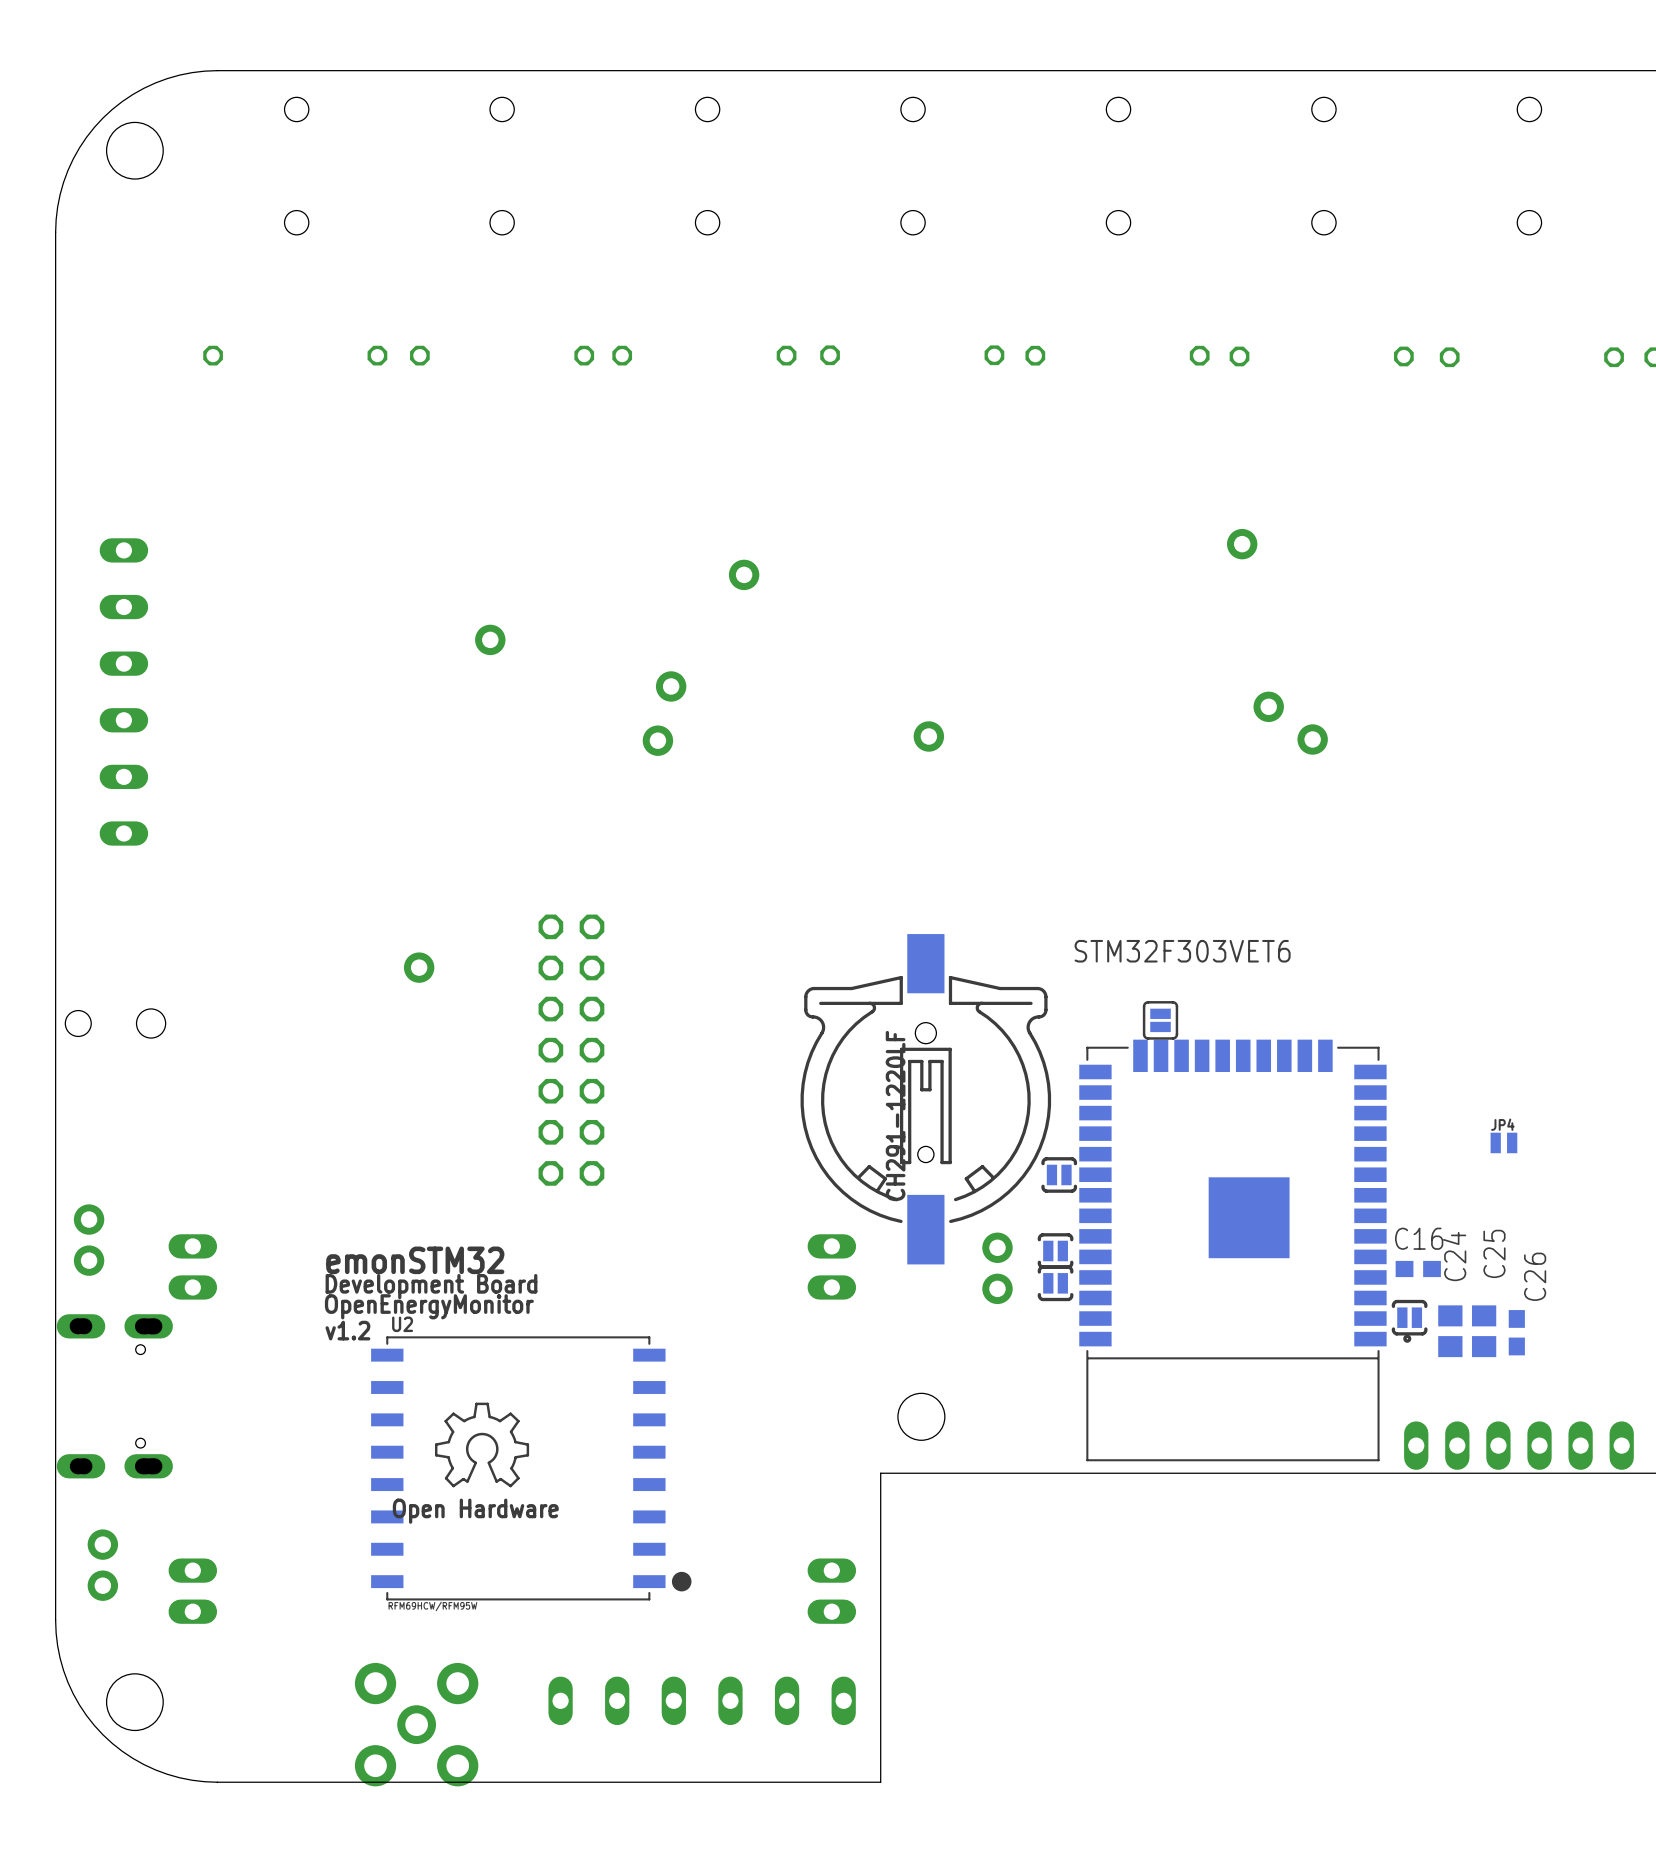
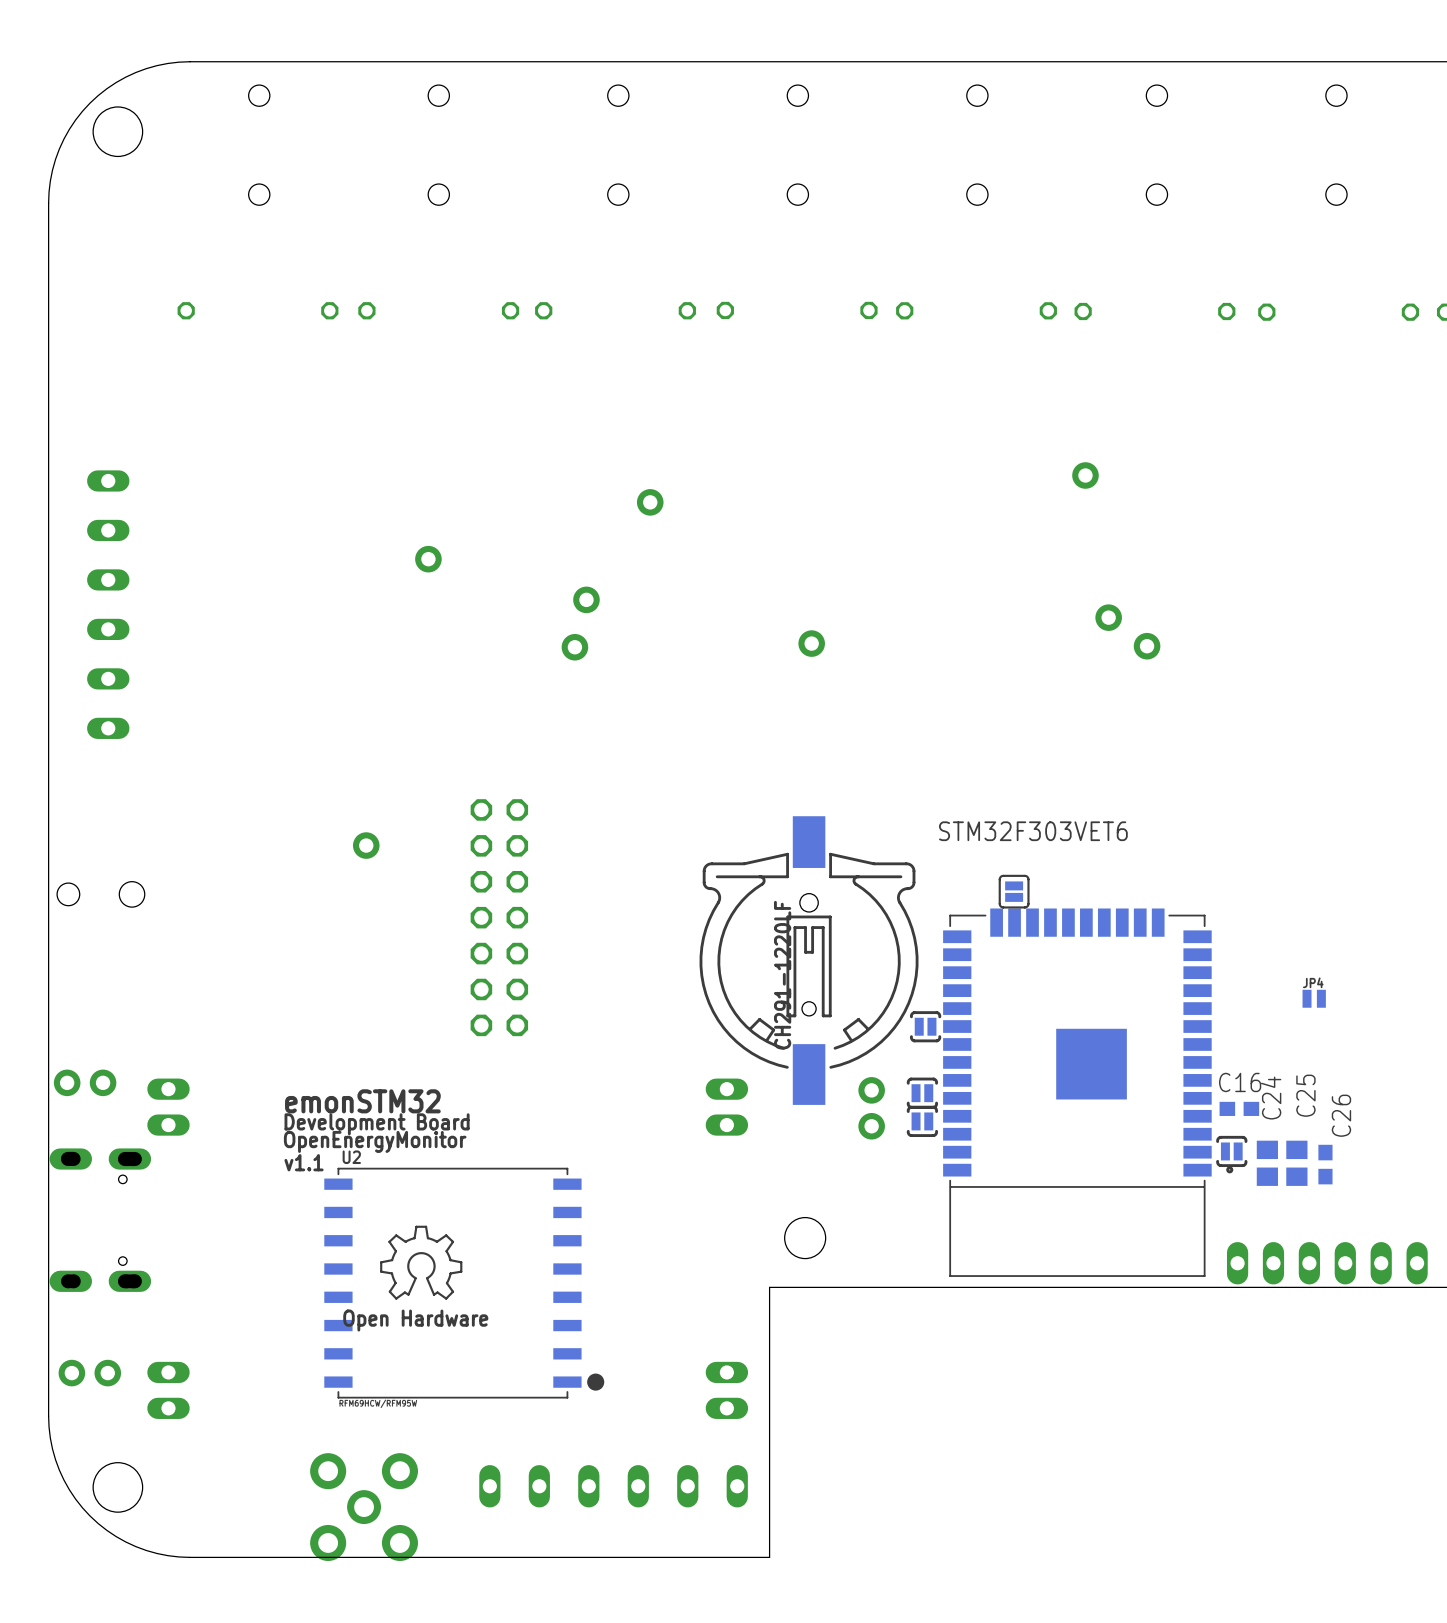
part rotation: 0° (89, 1240) -> 90° clockwise (85, 1082)
text: v1.2 (347, 1330) -> v1.1 (304, 1162)
part rotation: 0° (102, 1565) -> 90° clockwise (89, 1373)

